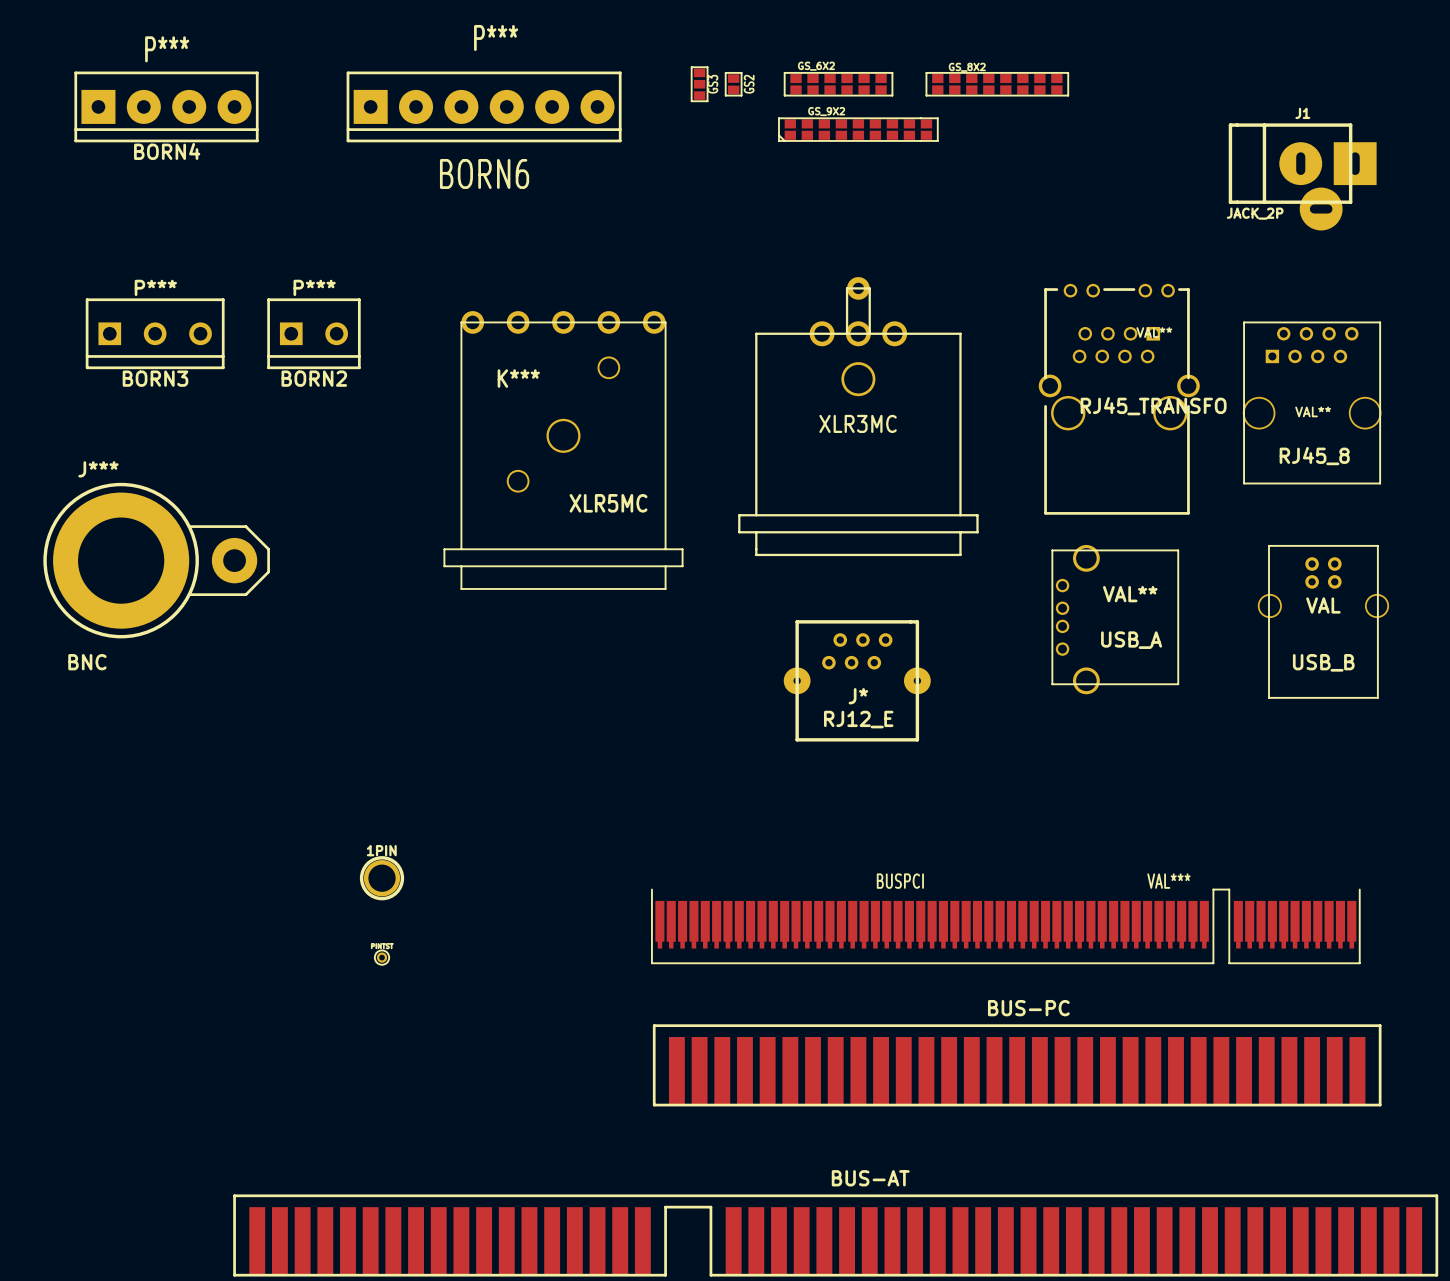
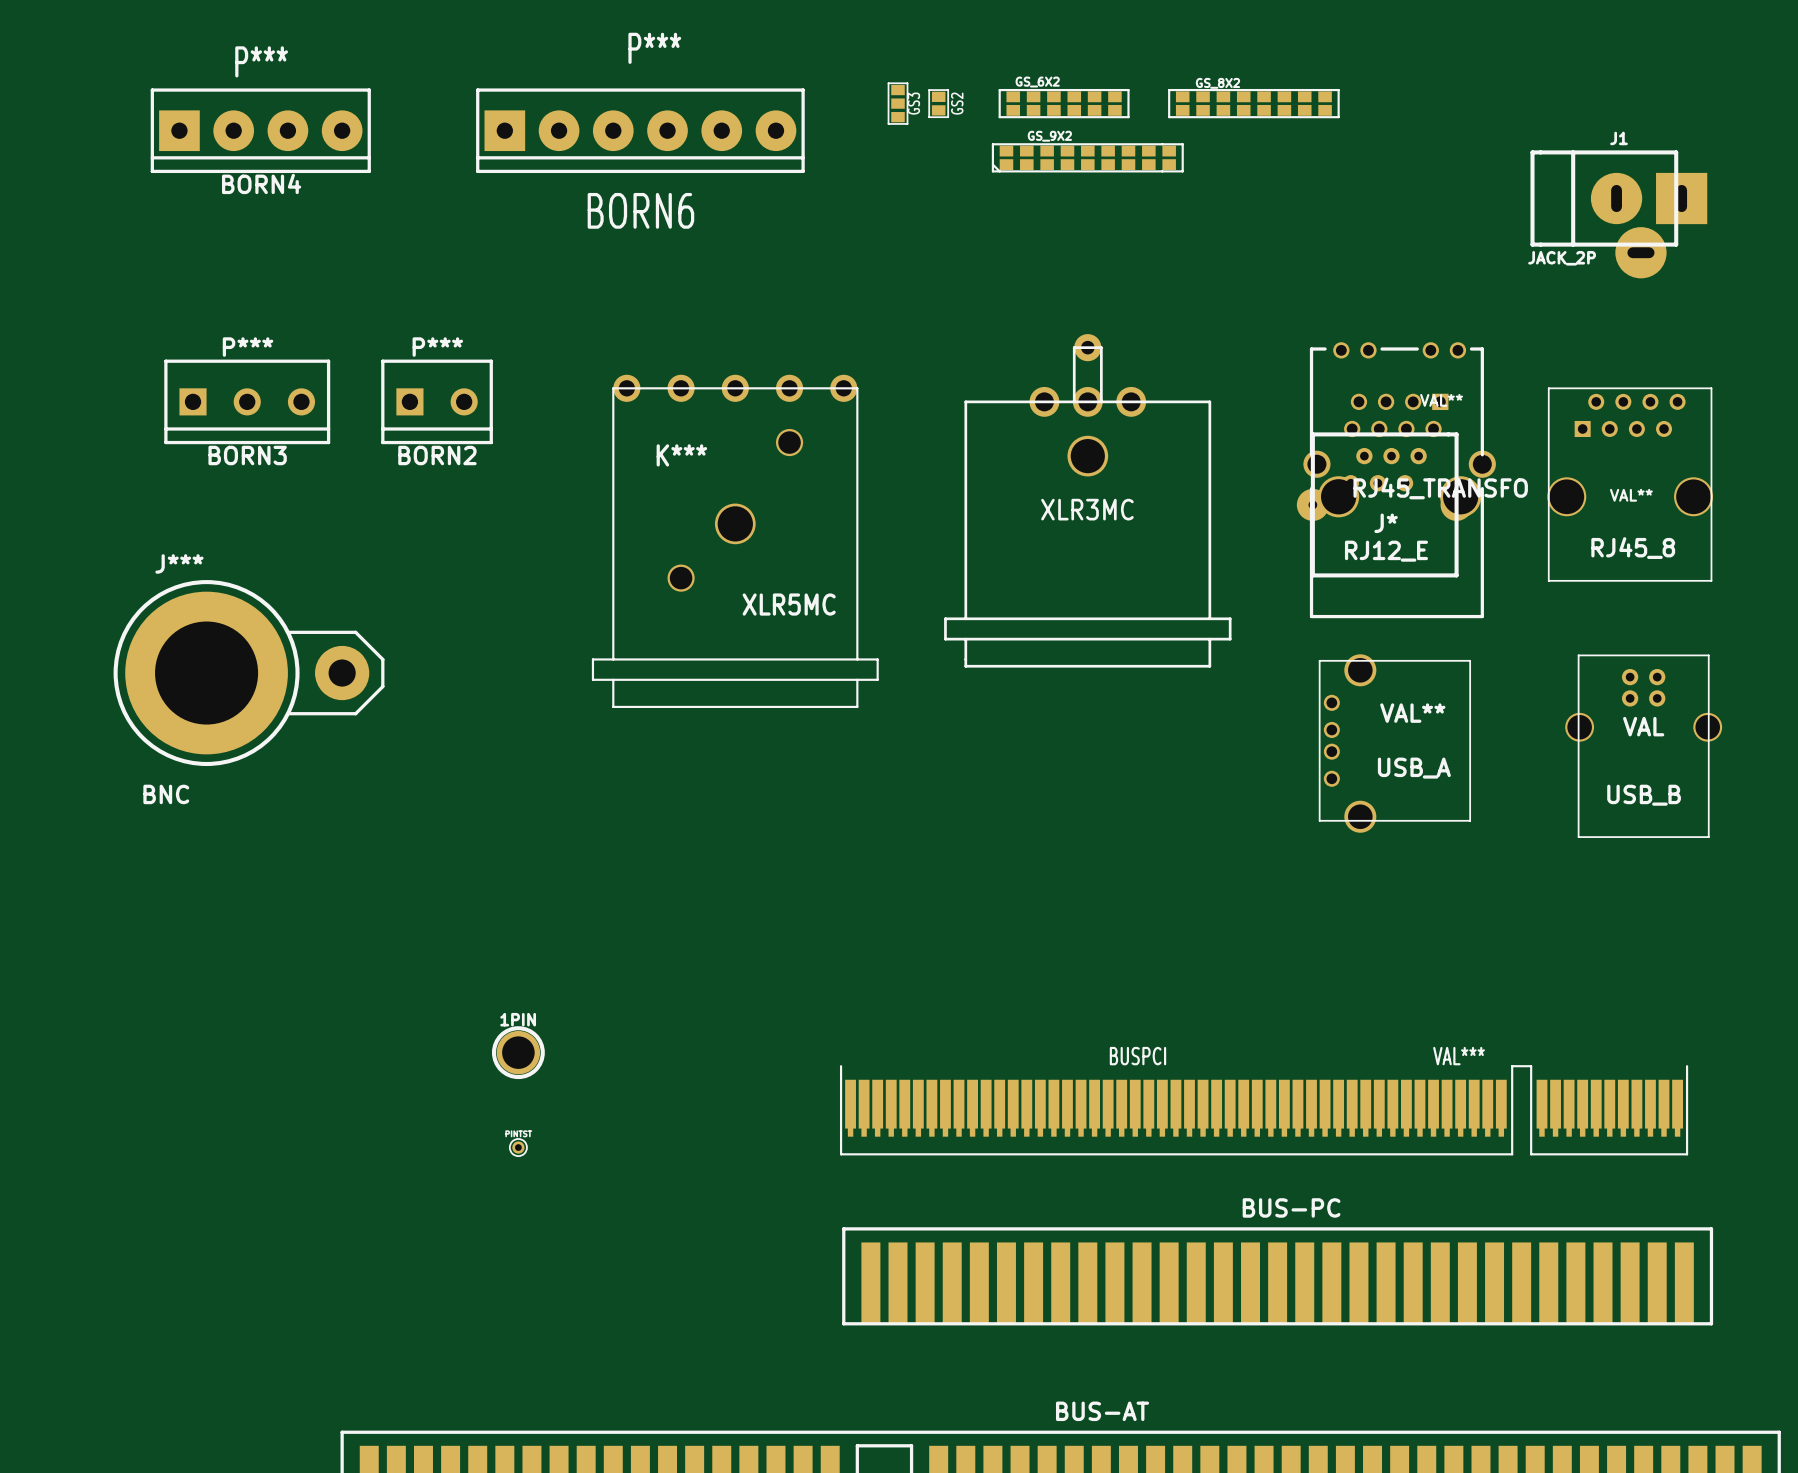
RJ12_E position: (857, 680) -> (1384, 504)

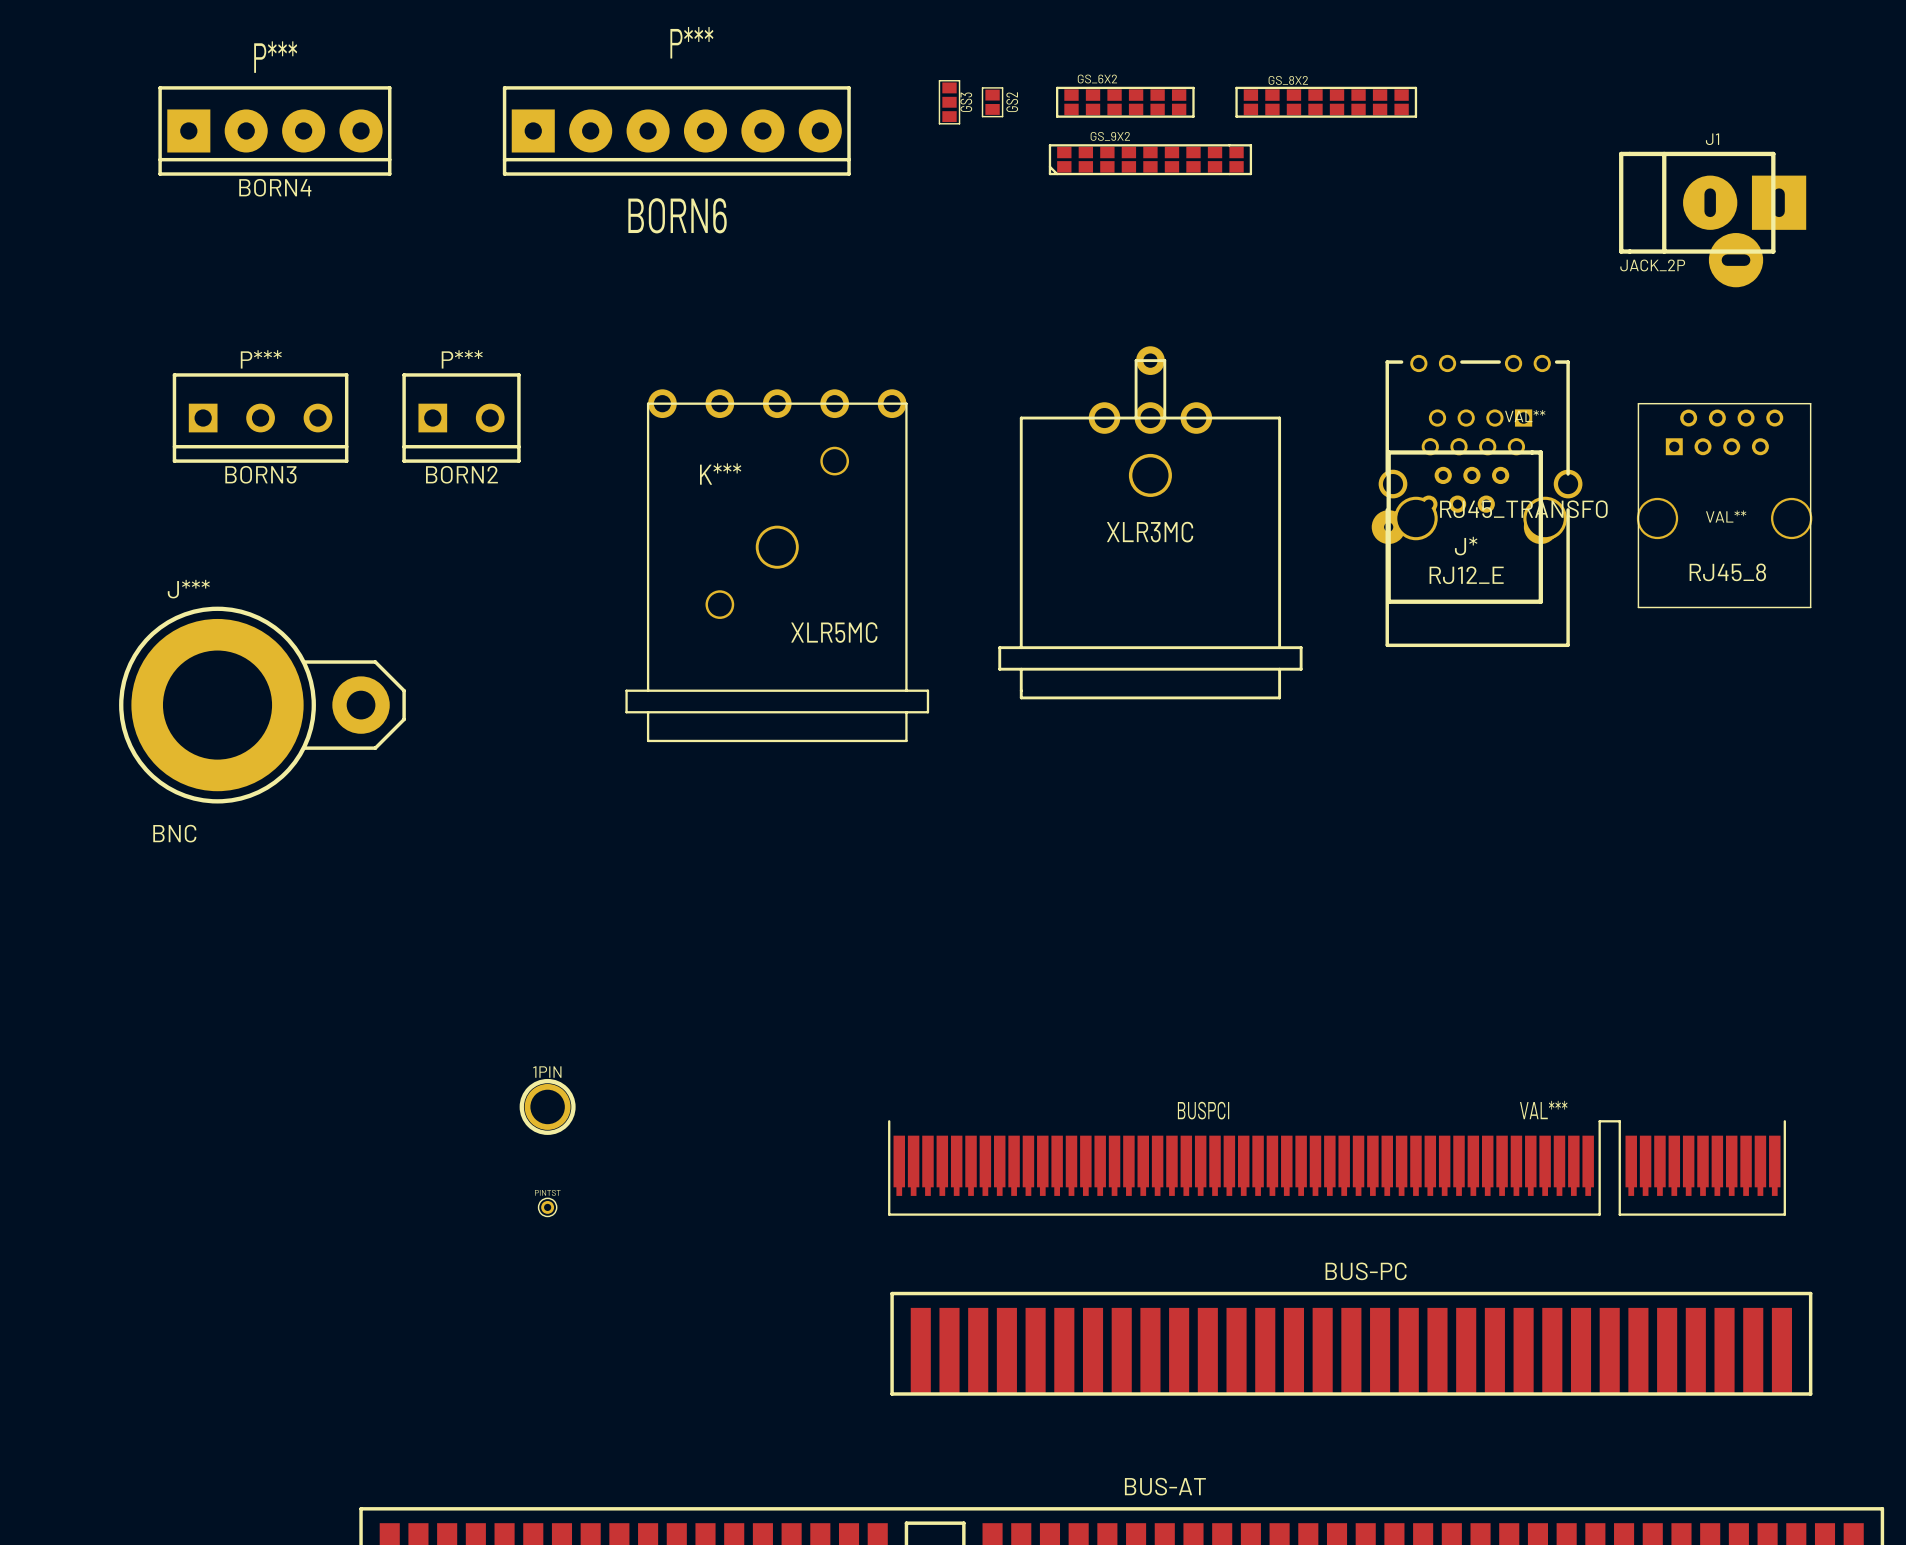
USB_A: VAL** (1394, 743) -> none
USB_B: VAL (1643, 746) -> none

